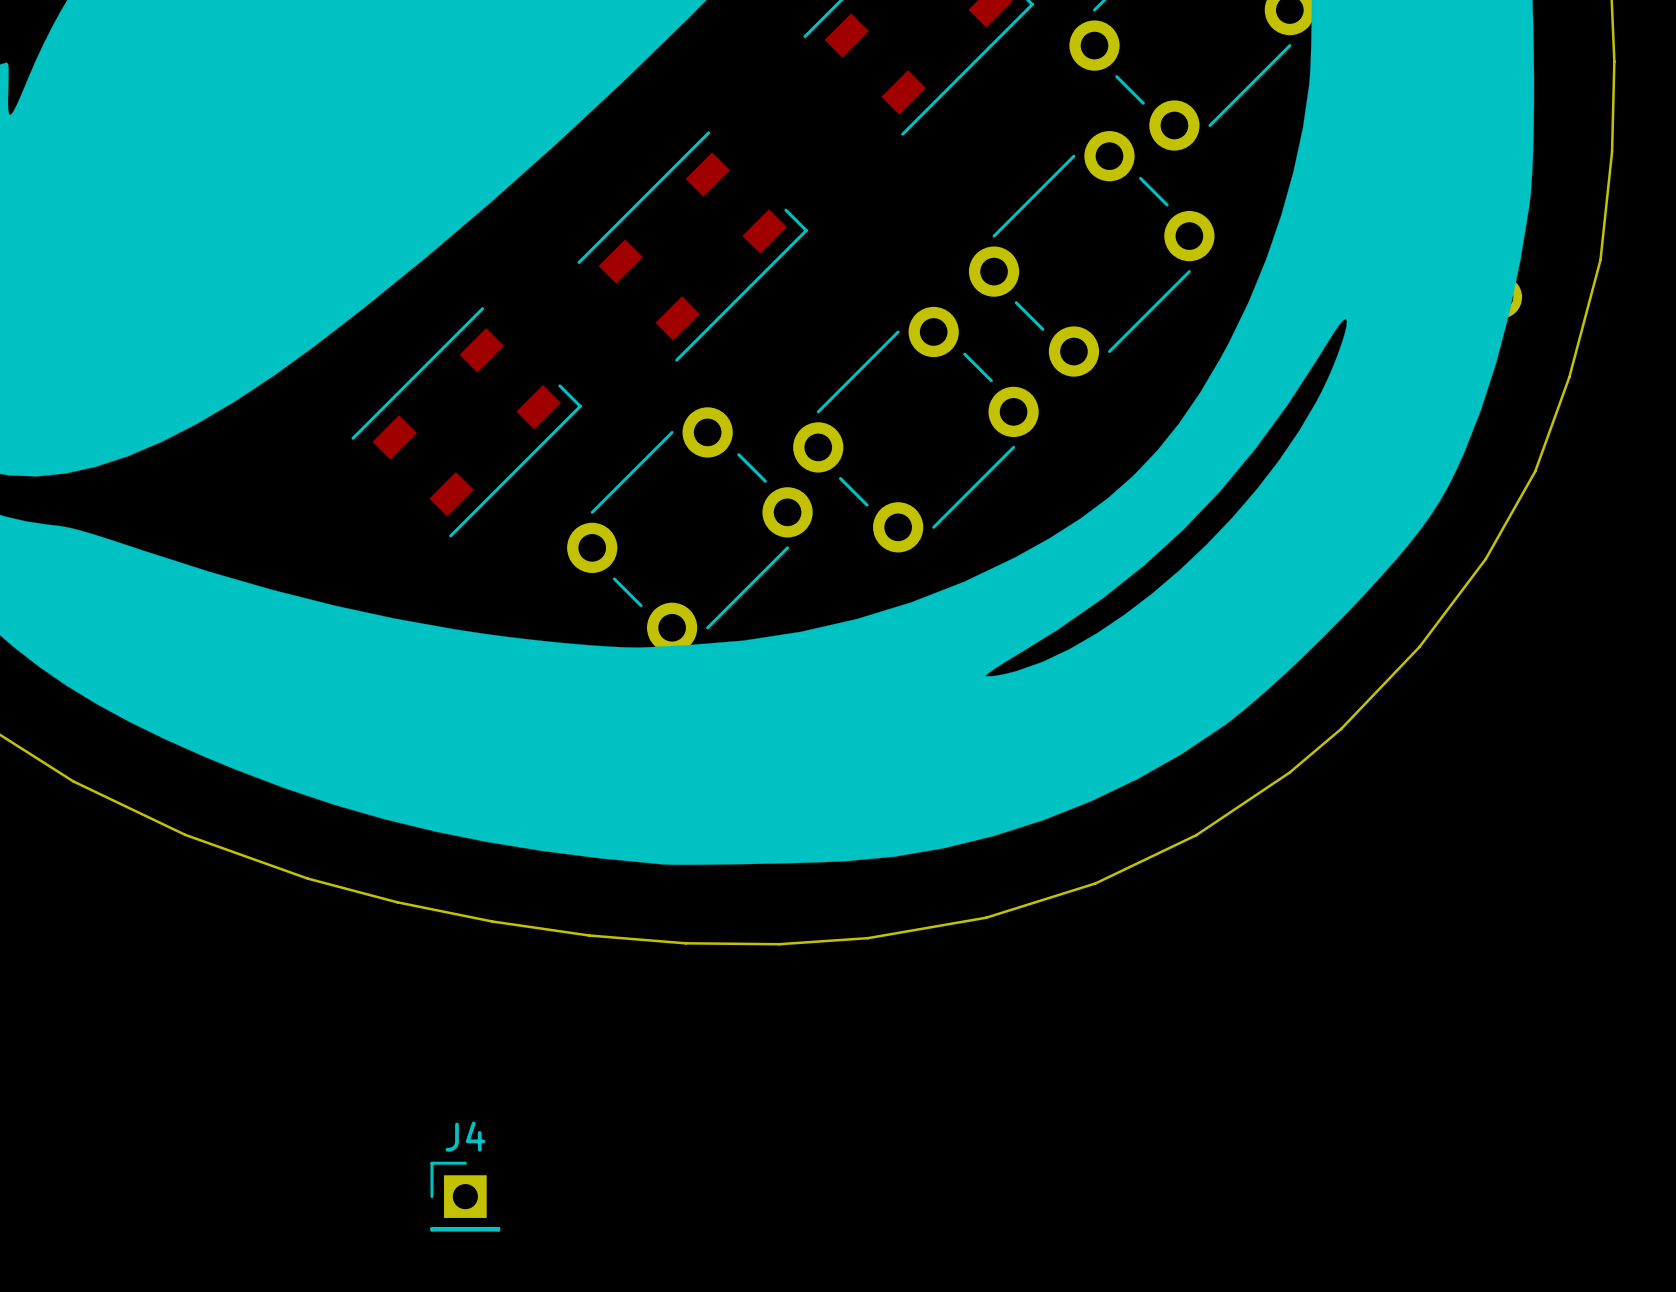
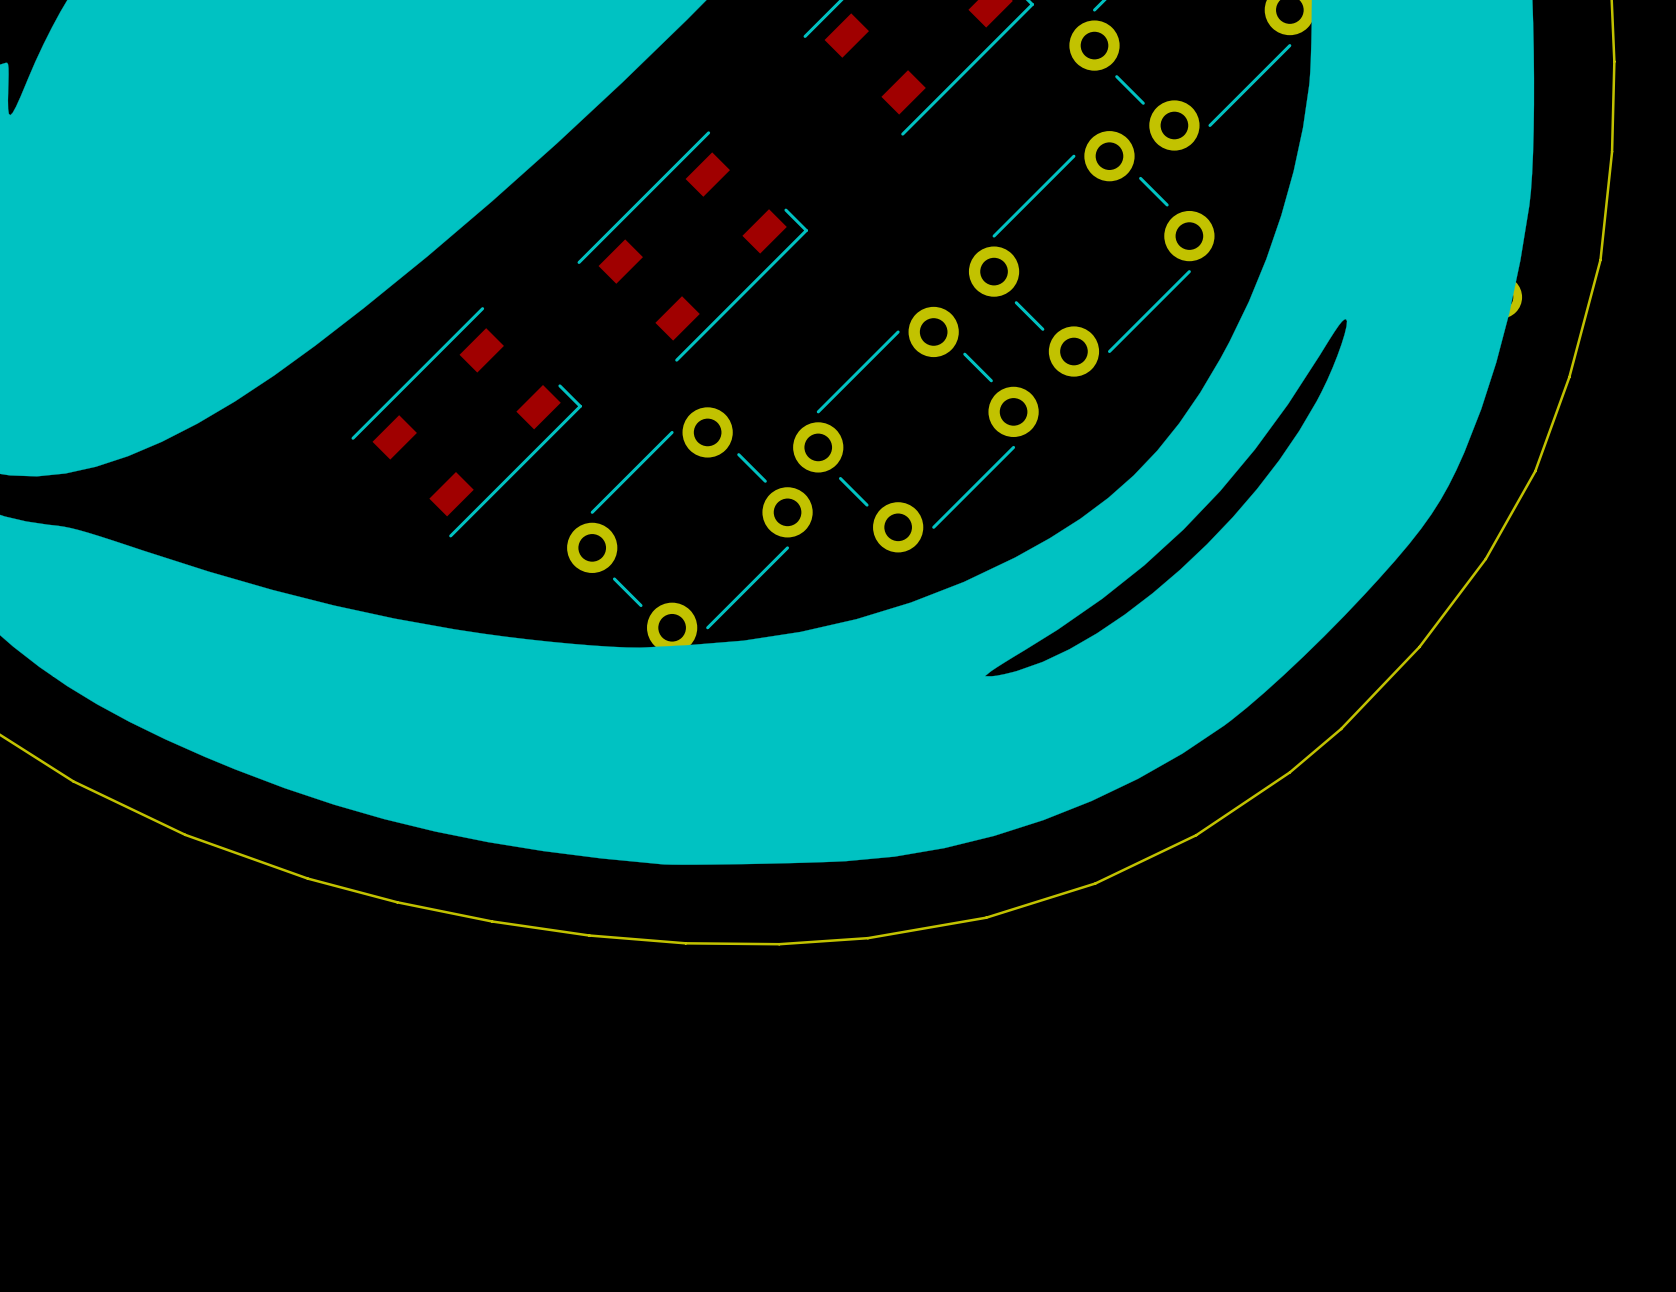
J4: (465, 1196) -> none

